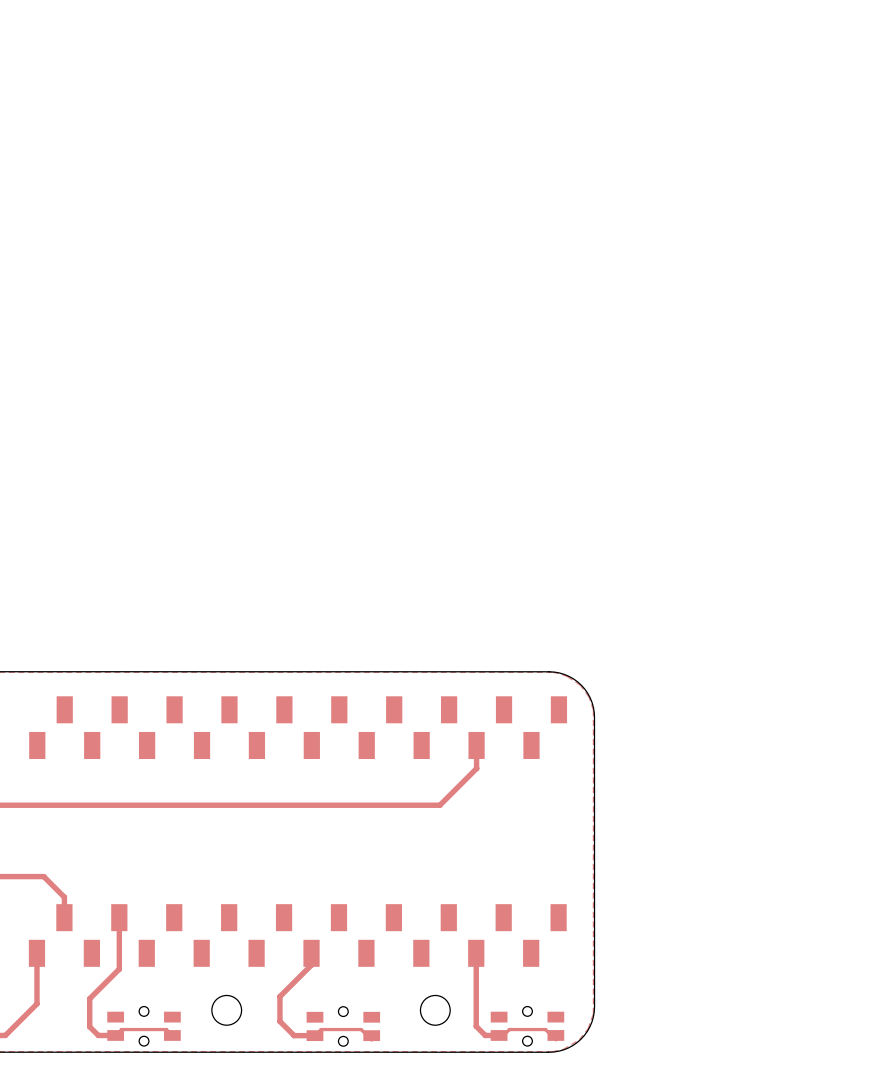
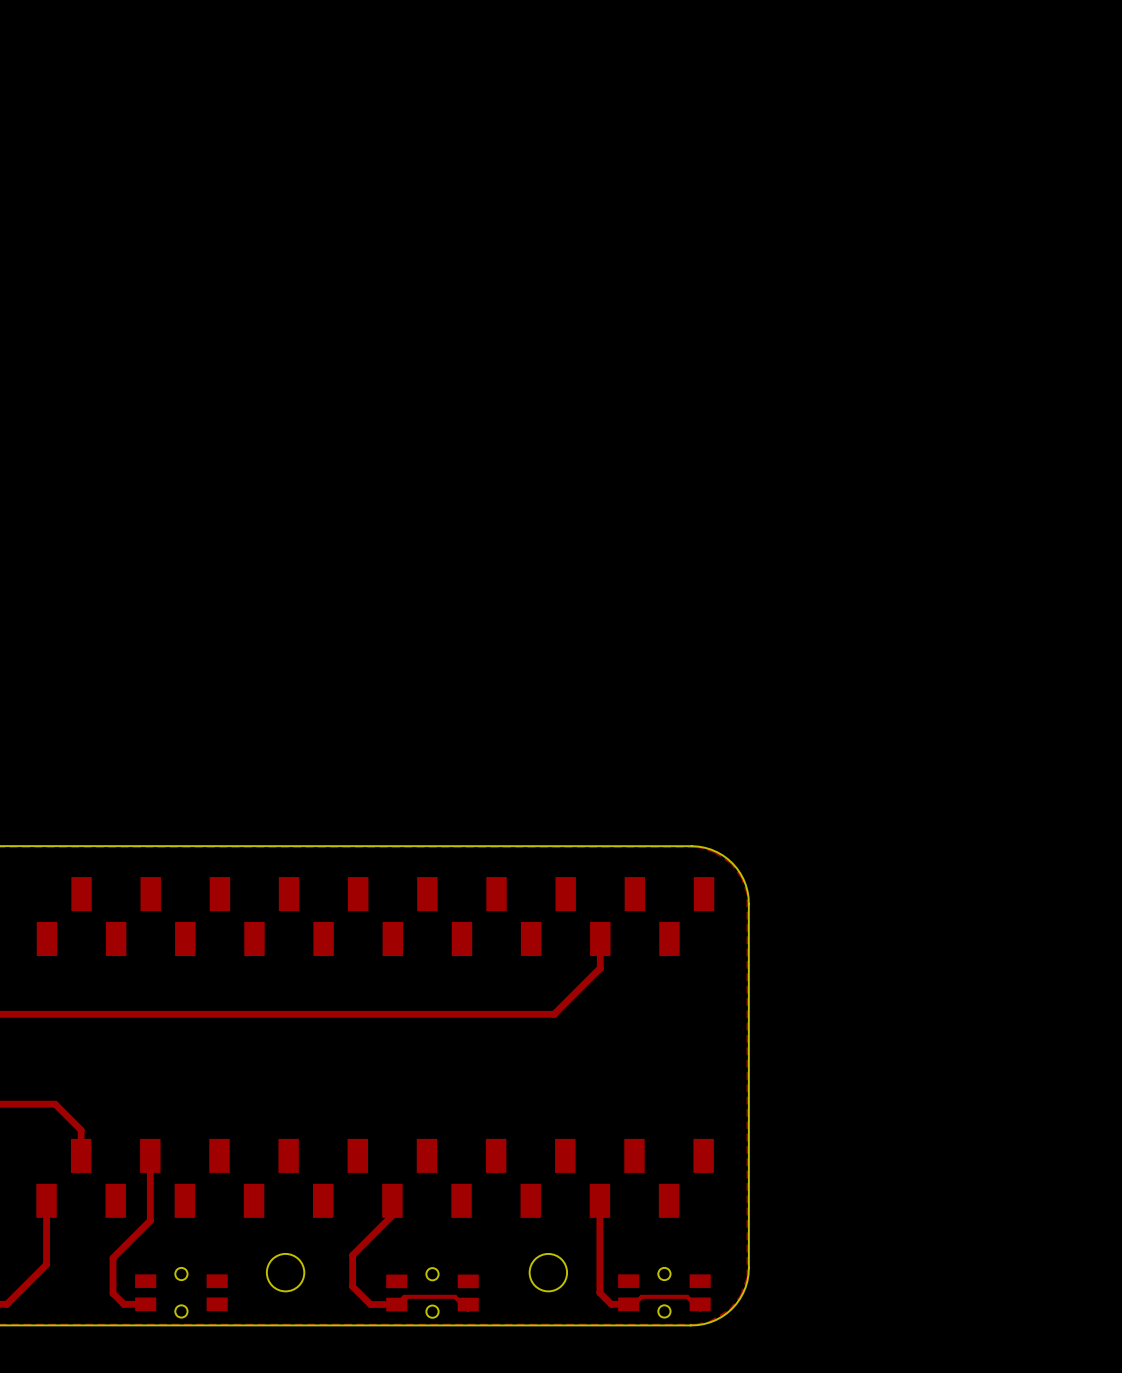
top track: (172, 1035) (166, 1029) (121, 1029) (115, 1035) -> none

